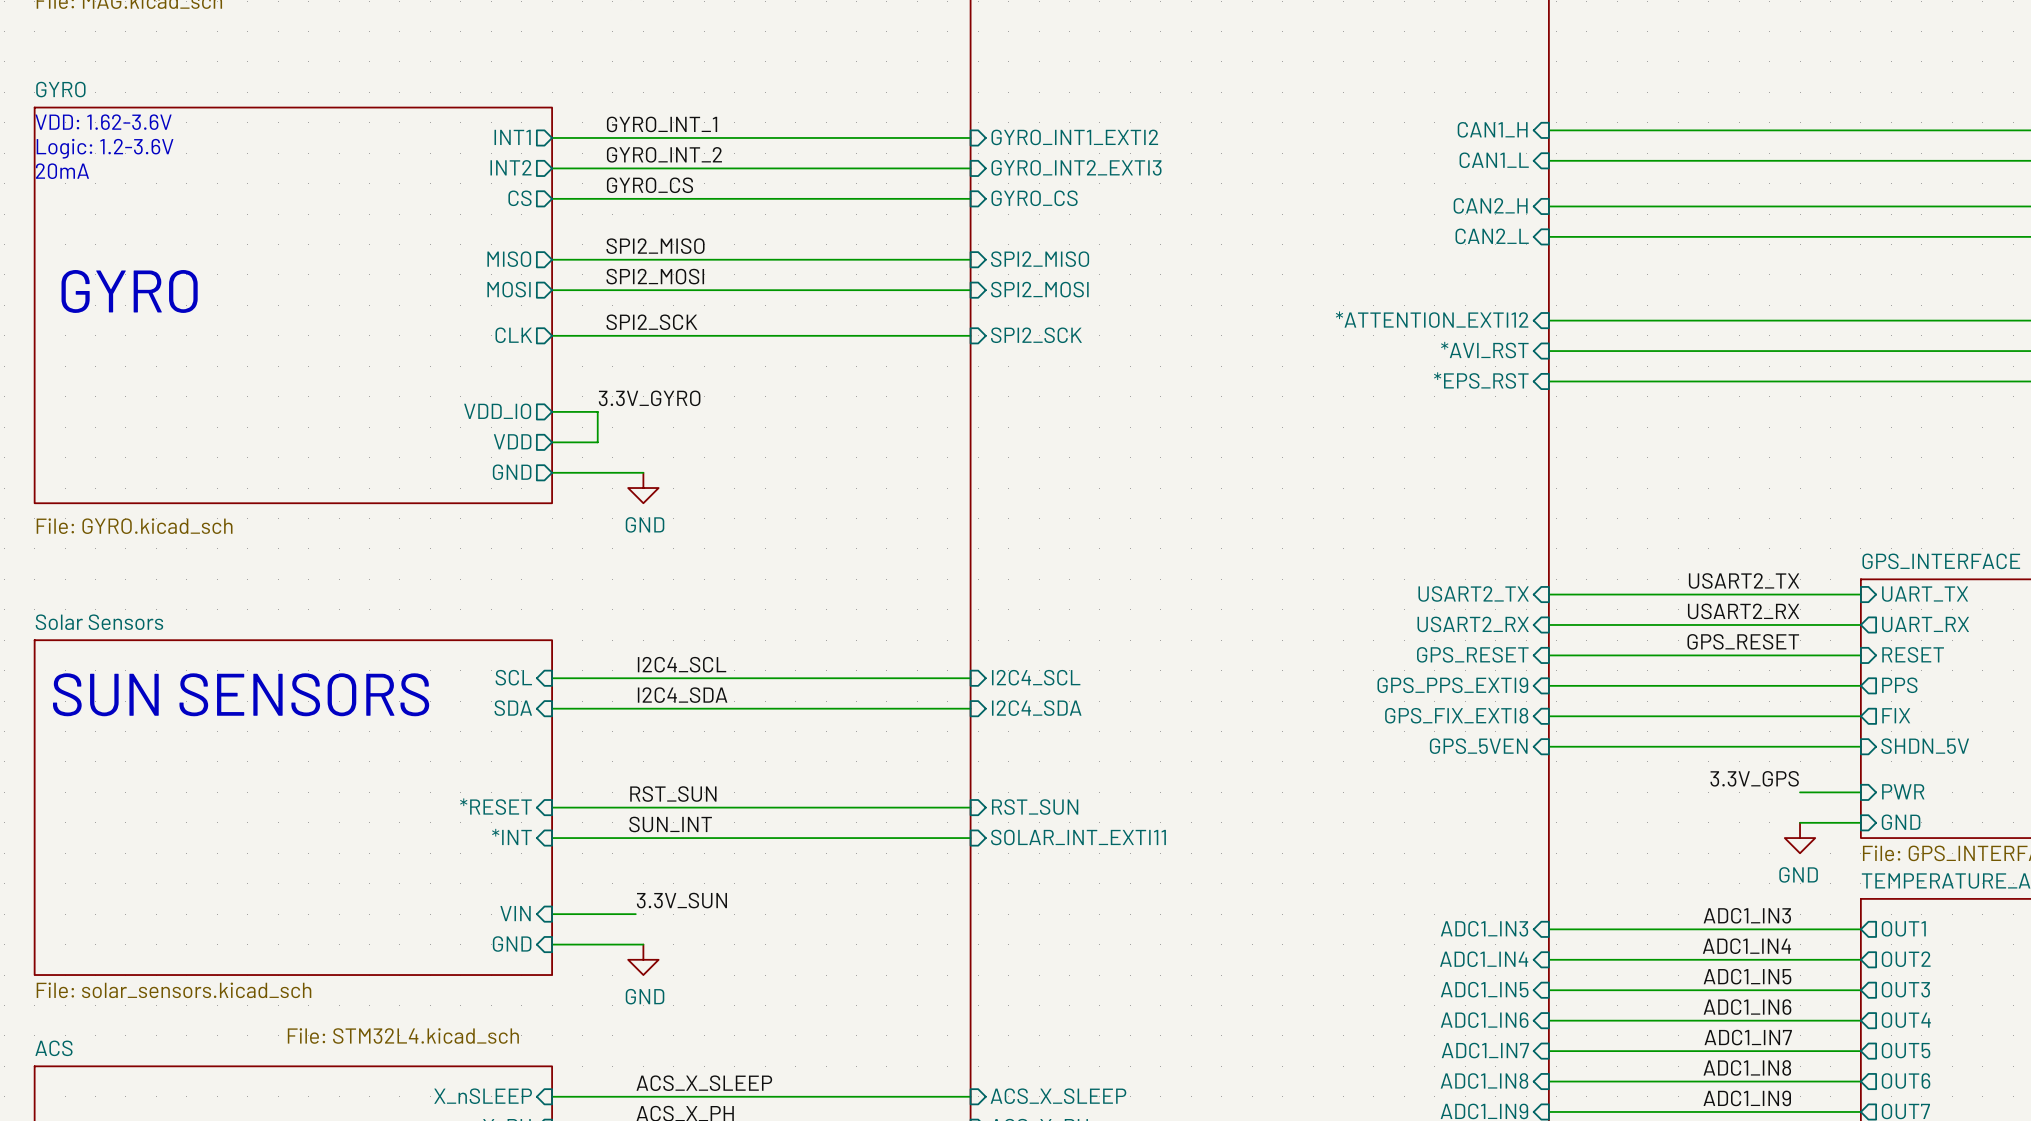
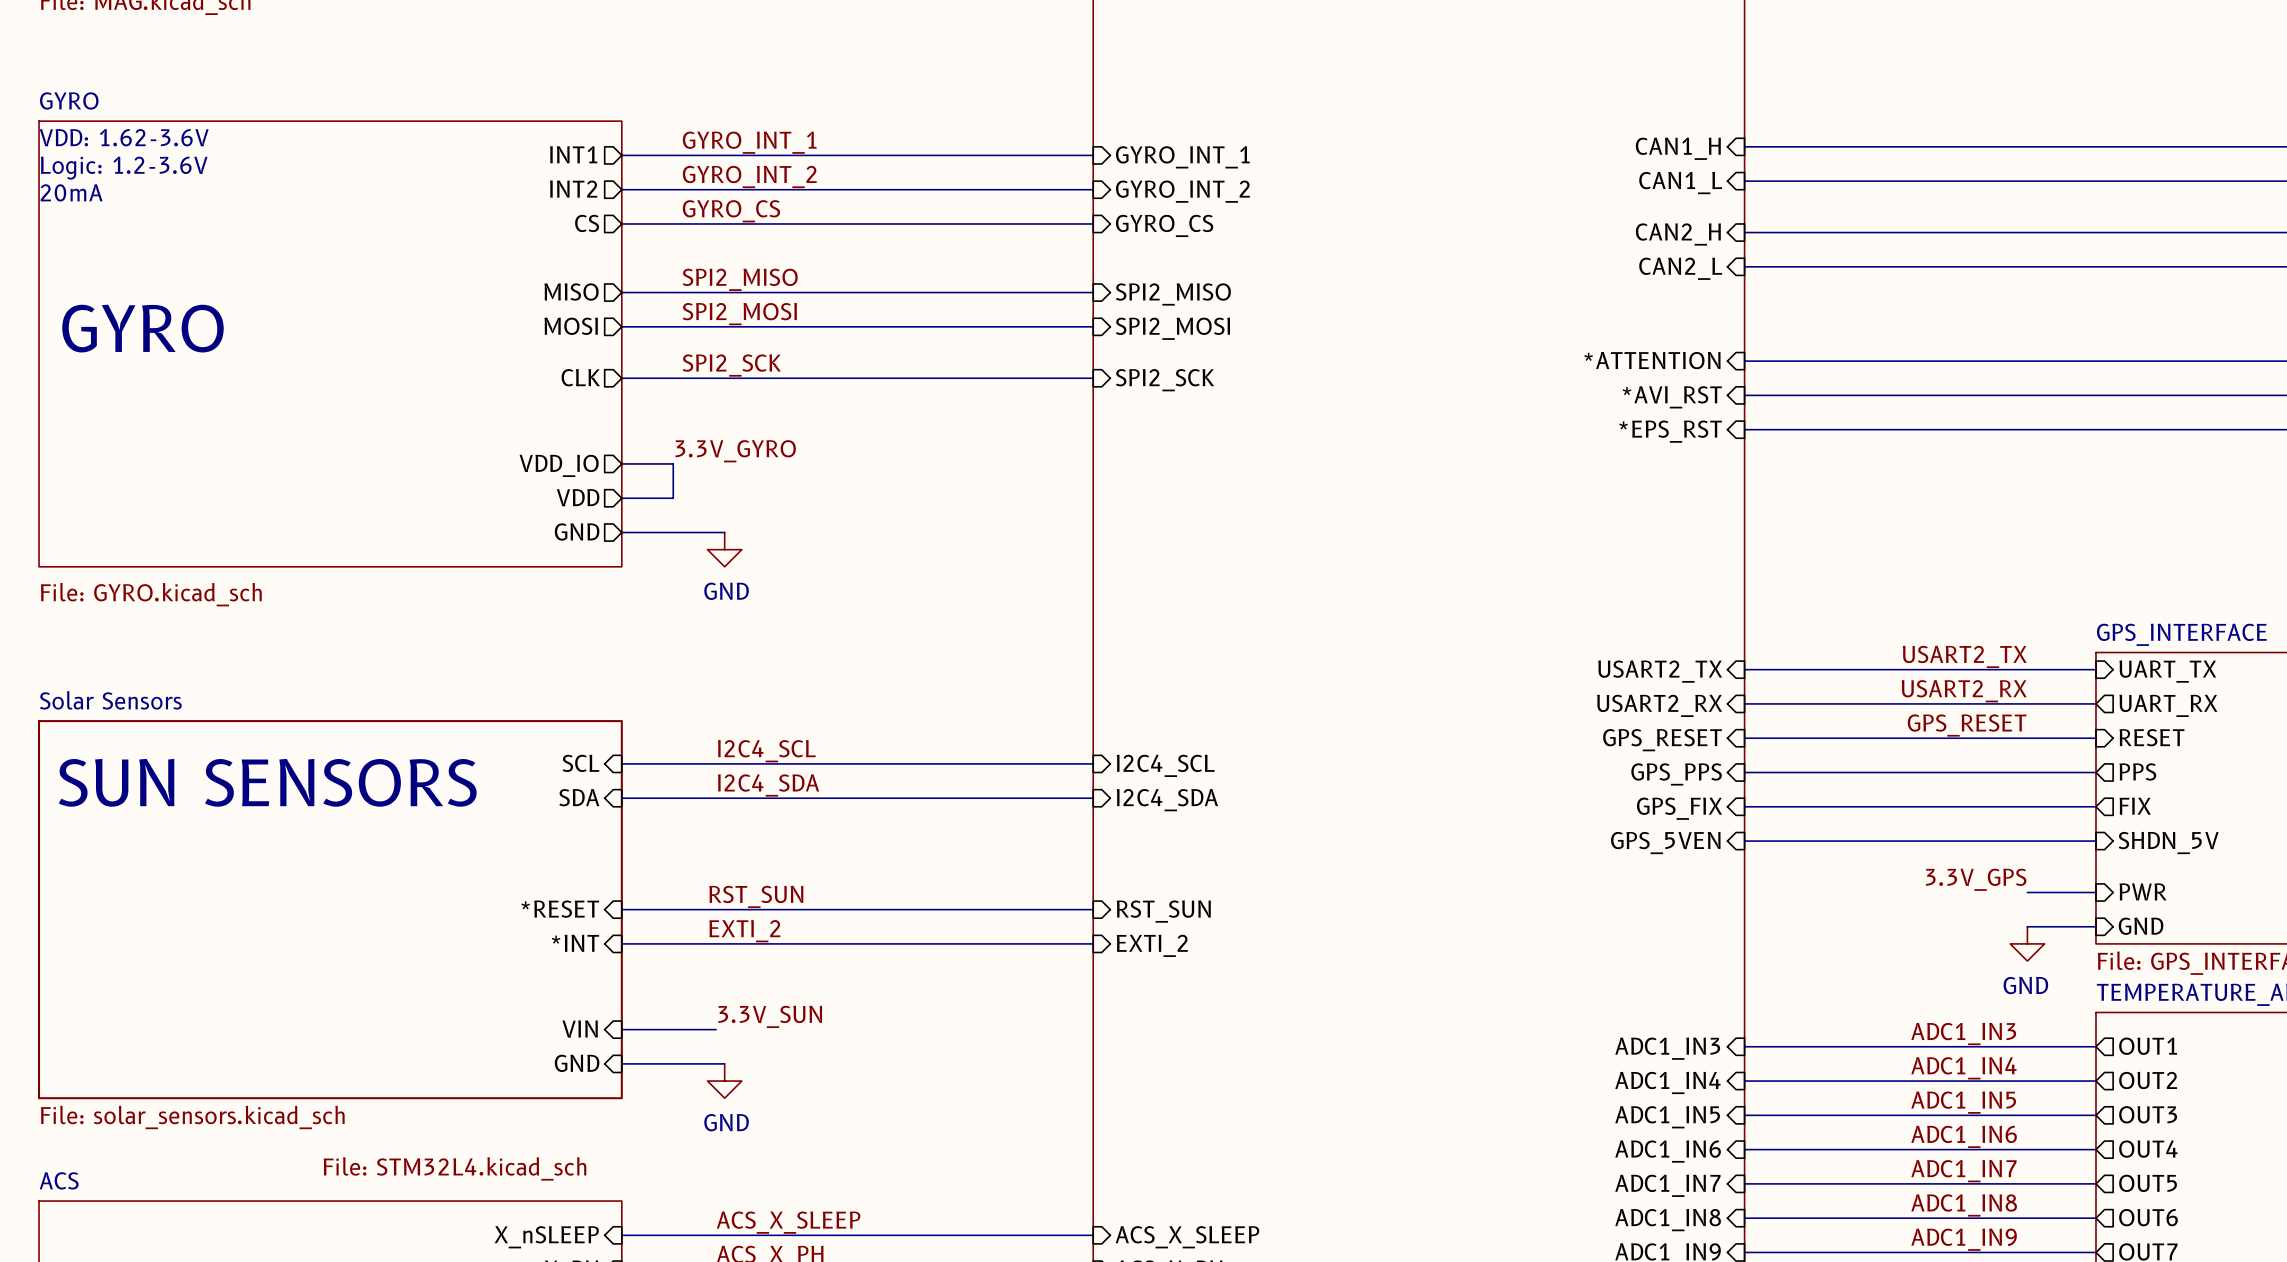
sheet pin: GYRO_INT1_EXTI2 (1074, 137) -> GYRO_INT_1 (1182, 157)
sheet pin: GYRO_INT2_EXTI3 (1076, 167) -> GYRO_INT_2 (1182, 191)
sheet pin: *ATTENTION_EXTI12 (1432, 319) -> *ATTENTION (1652, 360)
sheet pin: GPS_PPS_EXTI9 (1452, 685) -> GPS_PPS (1676, 774)
sheet pin: GPS_FIX_EXTI8 (1456, 715) -> GPS_FIX (1679, 808)
label: SUN_INT (670, 824) -> EXTI_2 (744, 931)
sheet pin: SOLAR_INT_EXTI11 (1078, 837) -> EXTI_2 (1152, 945)

